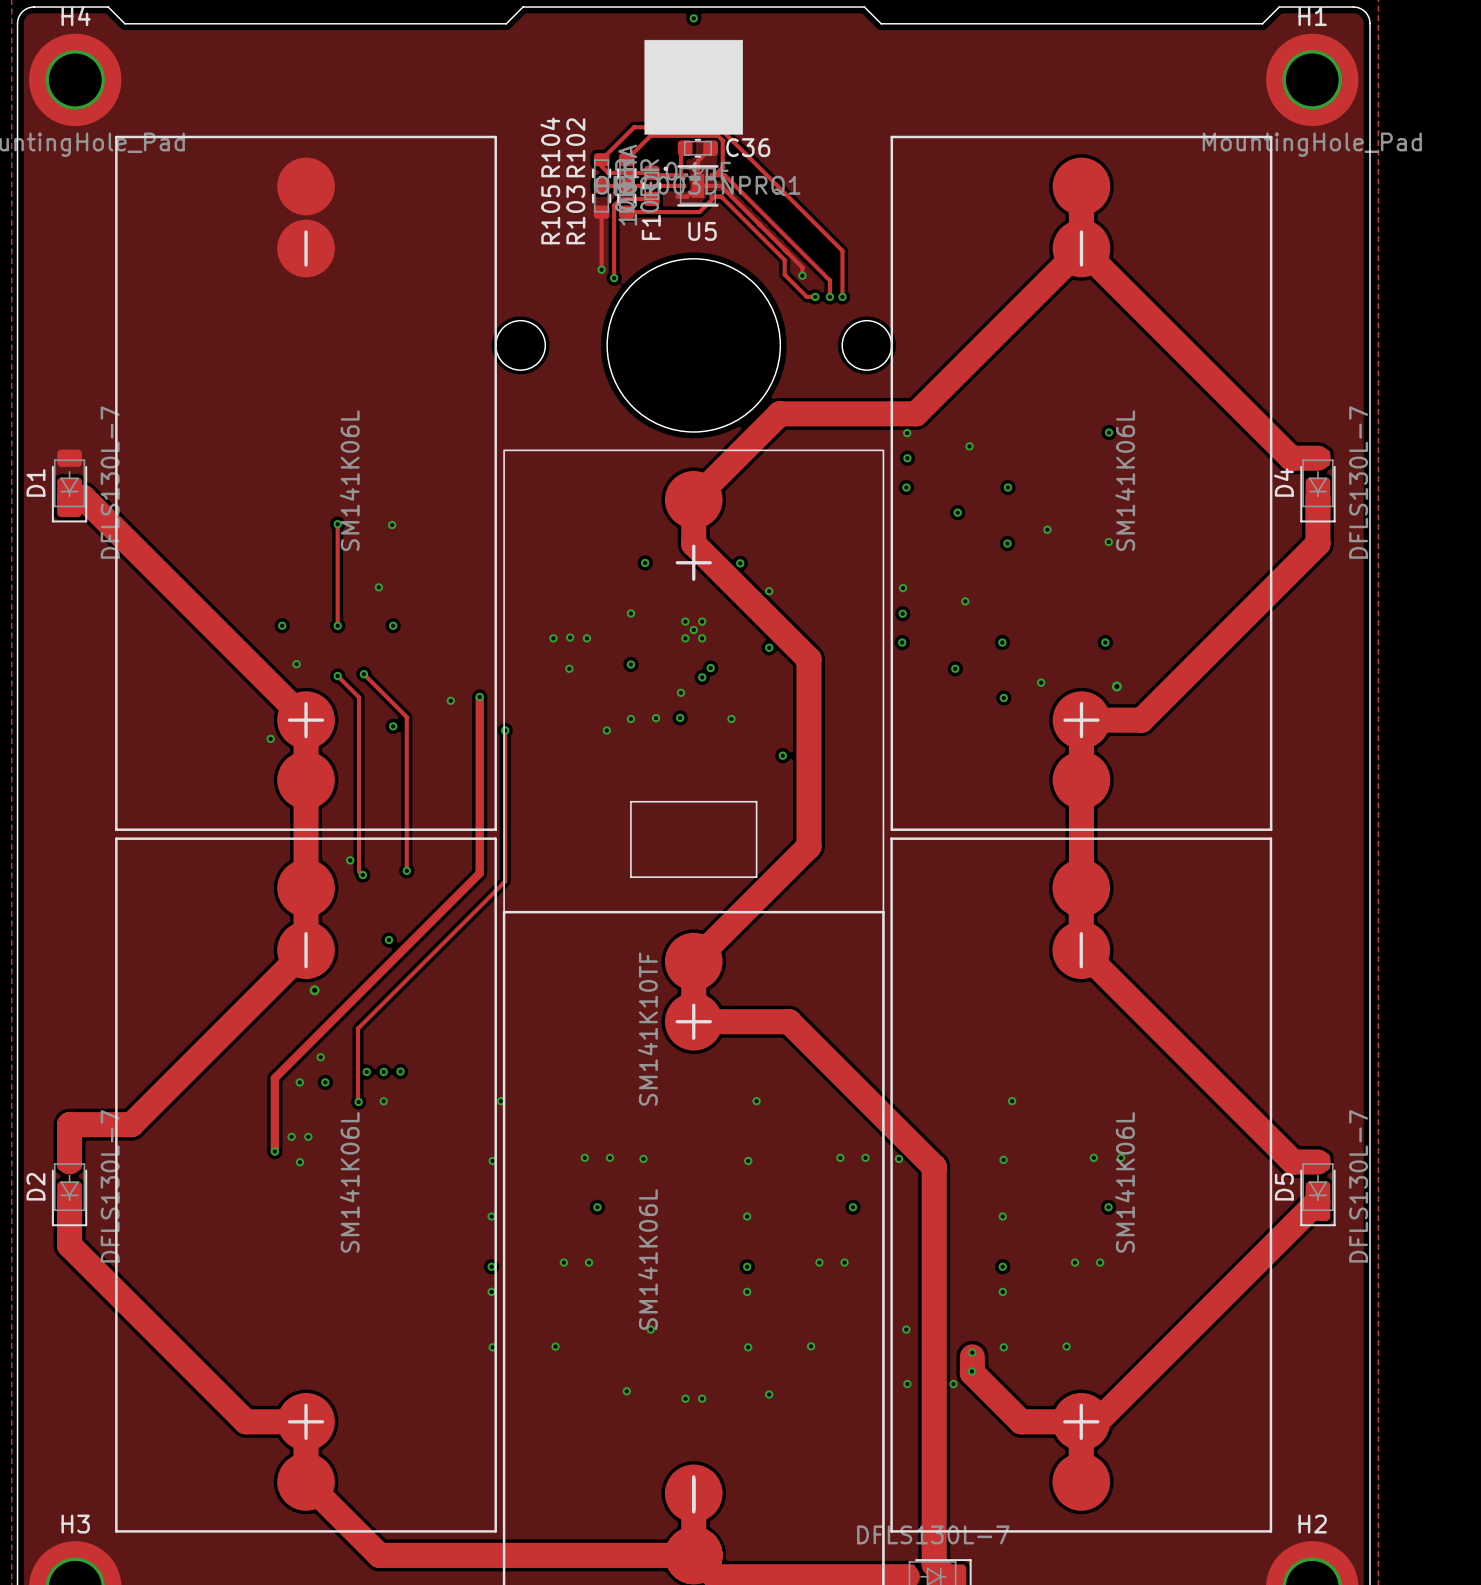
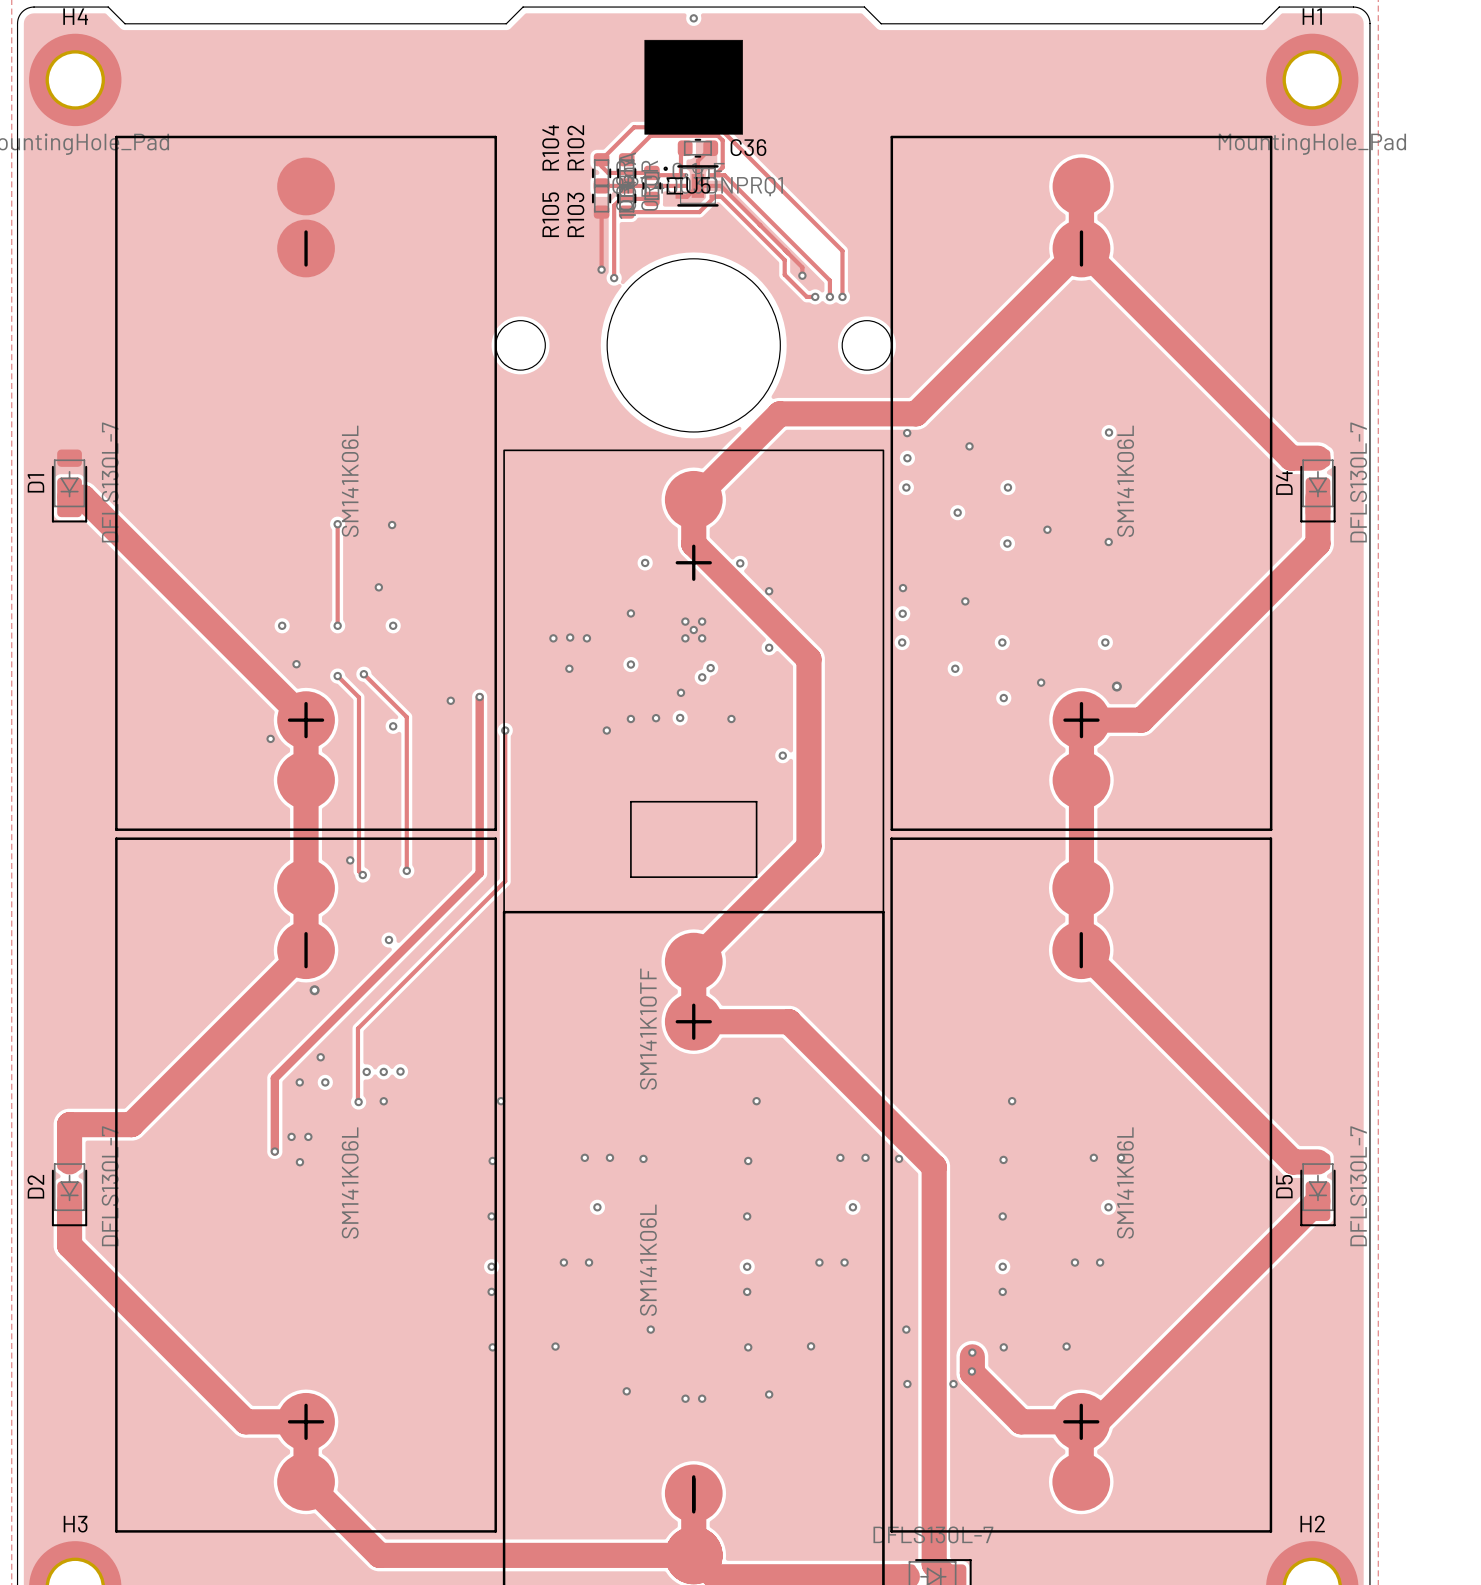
F1 name position: F1 (651, 227) -> F1 (674, 185)
U5 name position: U5 (702, 231) -> U5 (698, 185)

